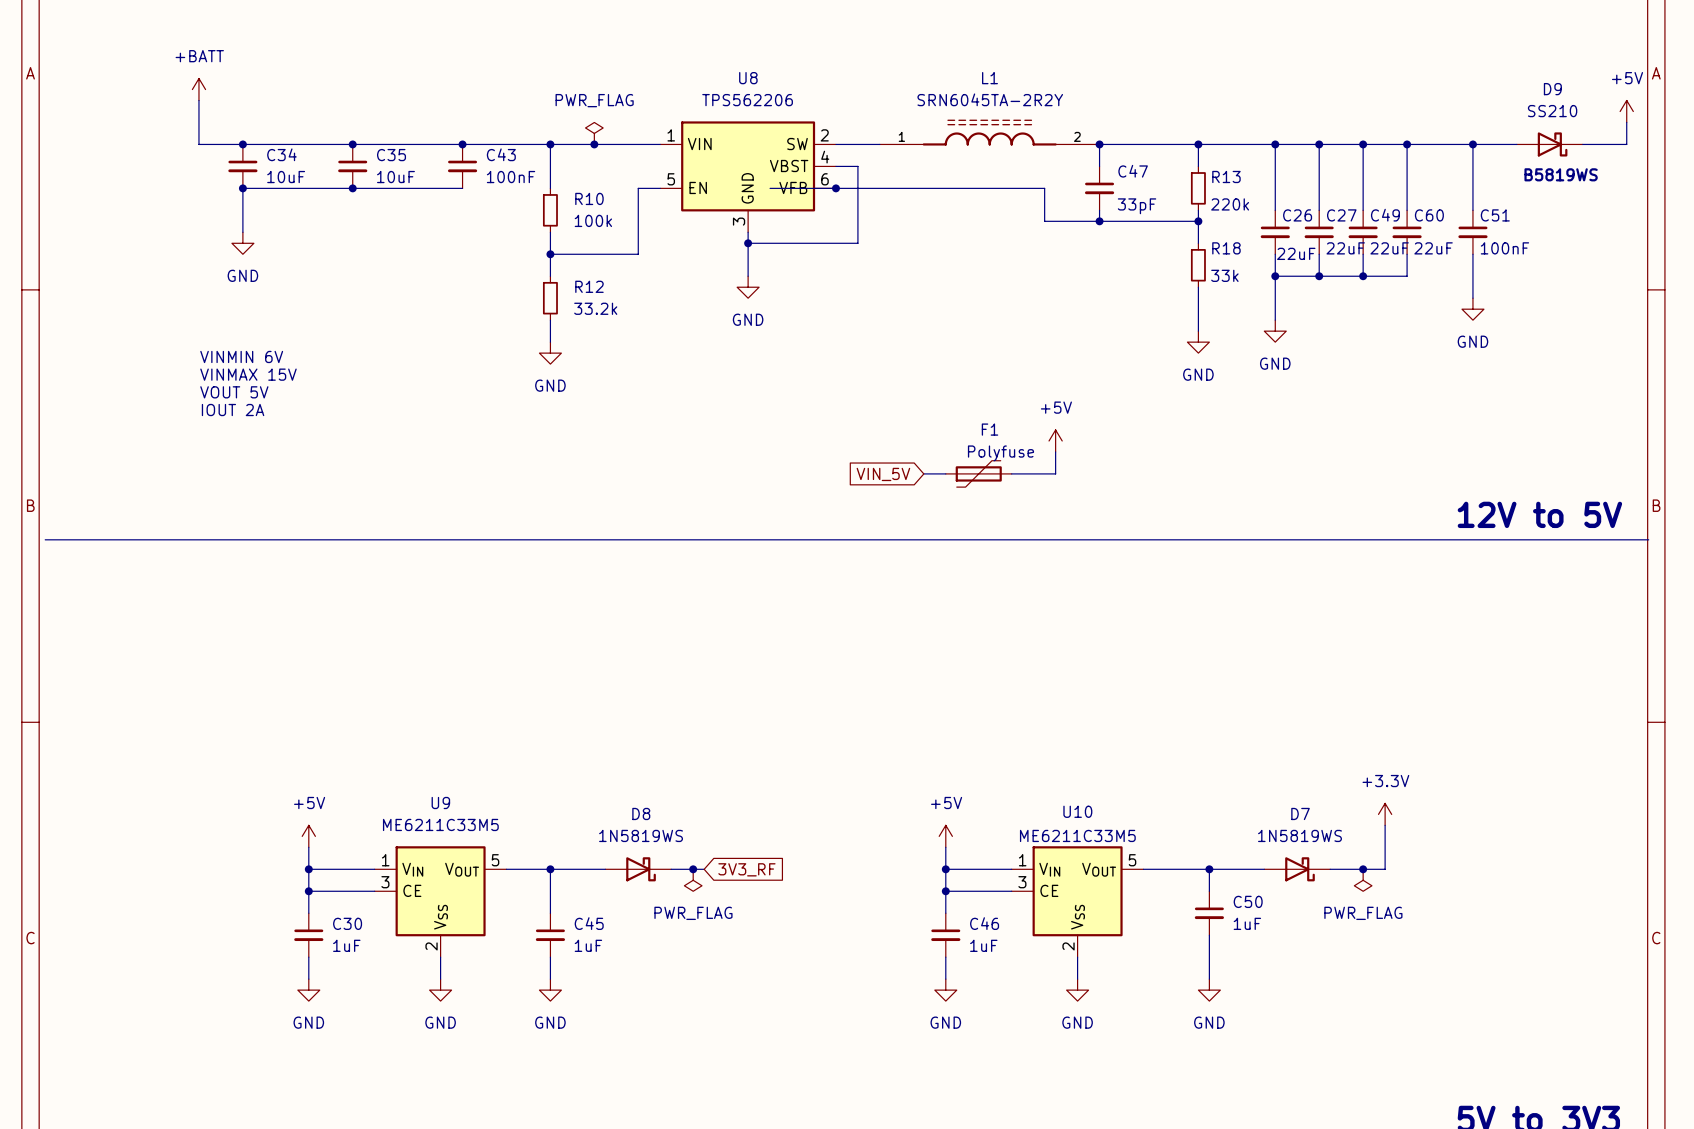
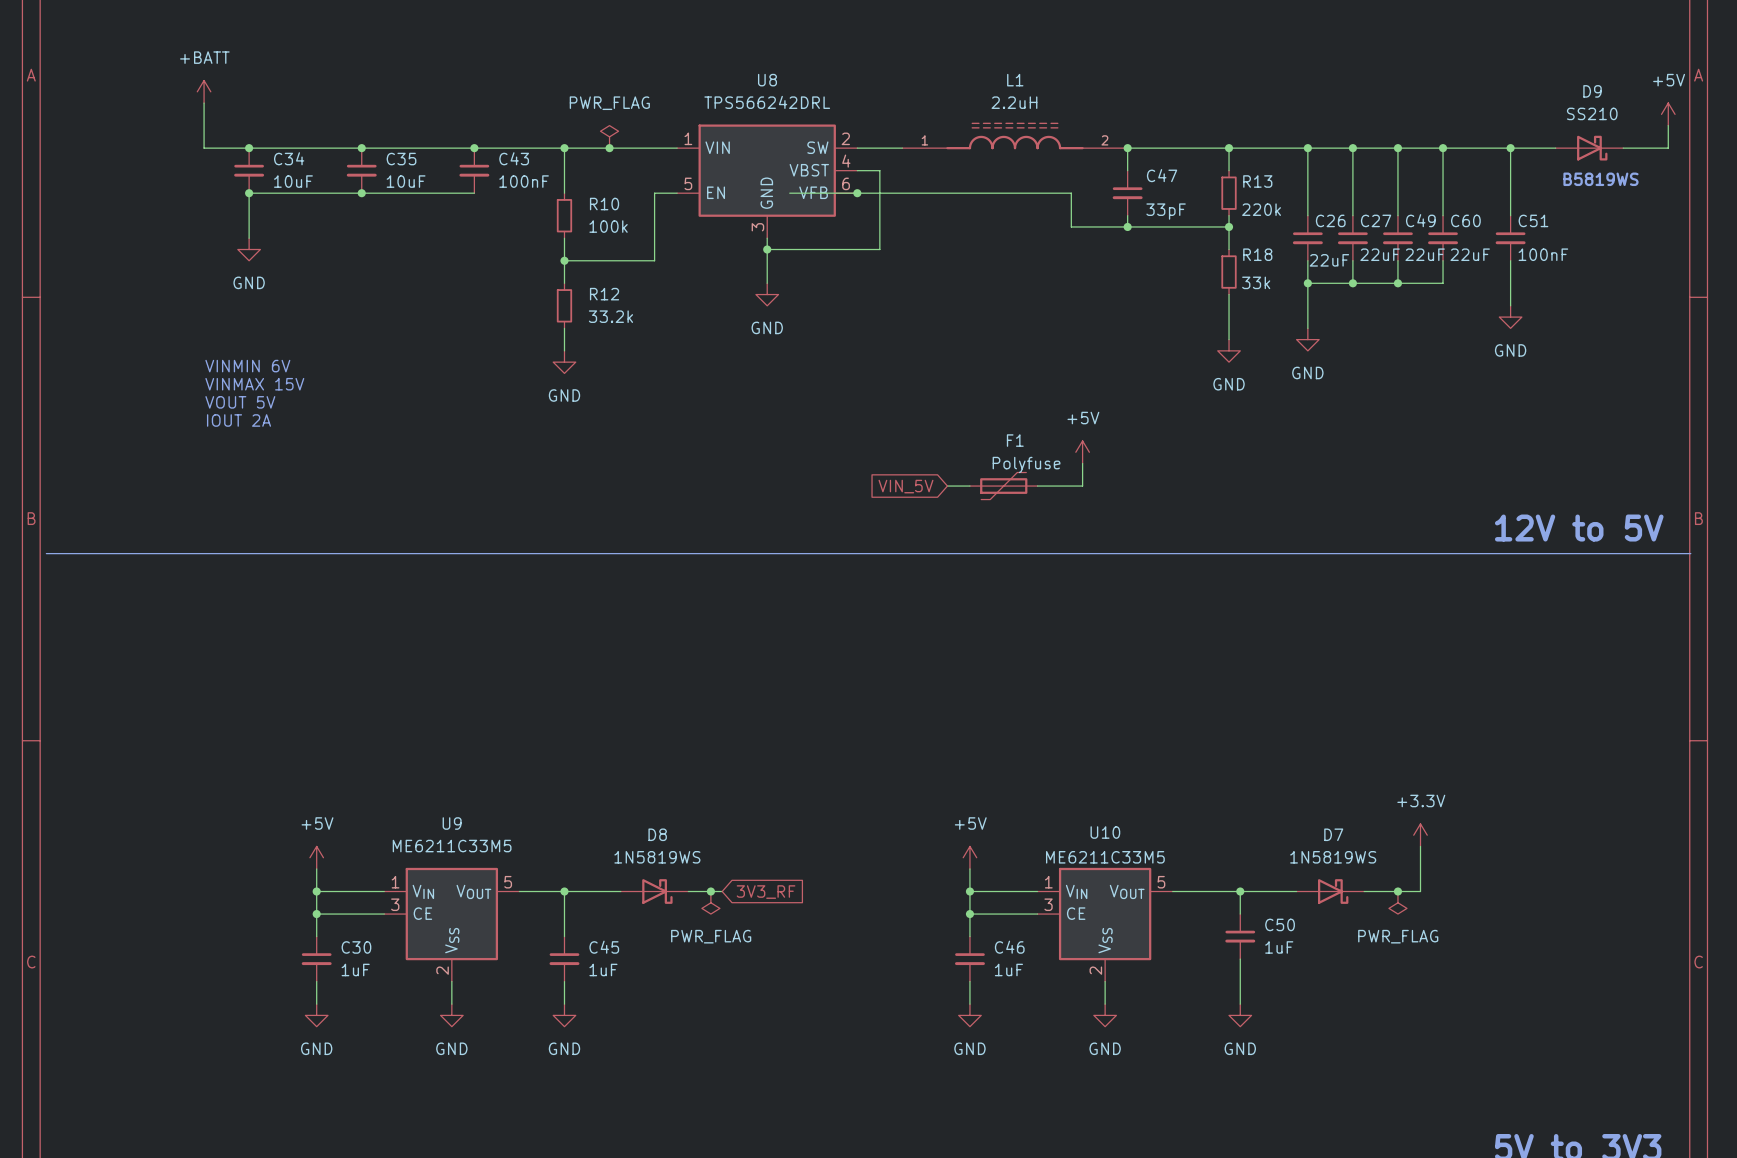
L1 value: SRN6045TA-2R2Y (990, 99) -> 2.2uH (1014, 102)
U8 value: TPS562206 (747, 100) -> TPS566242DRL (767, 102)

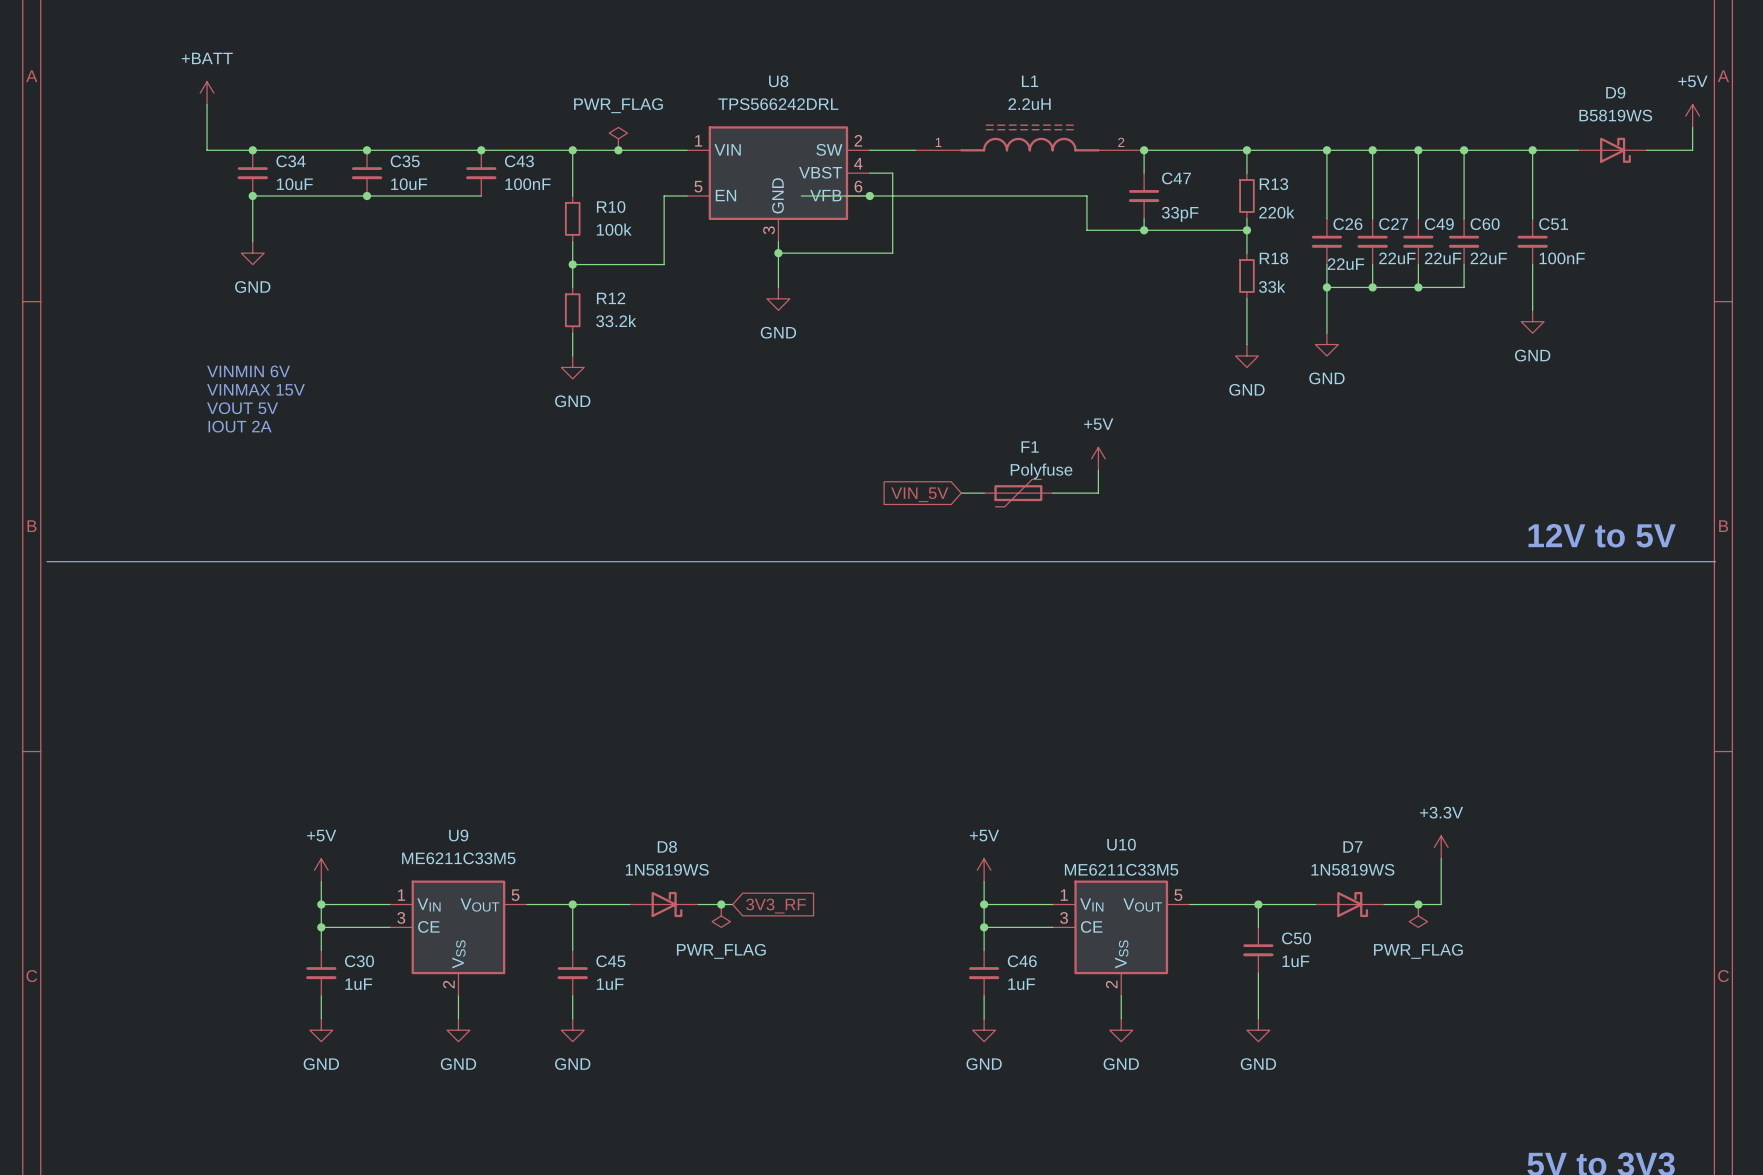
D9 value: SS210 (1592, 113) -> B5819WS (1615, 115)
text: B5819WS (1600, 179) -> none

